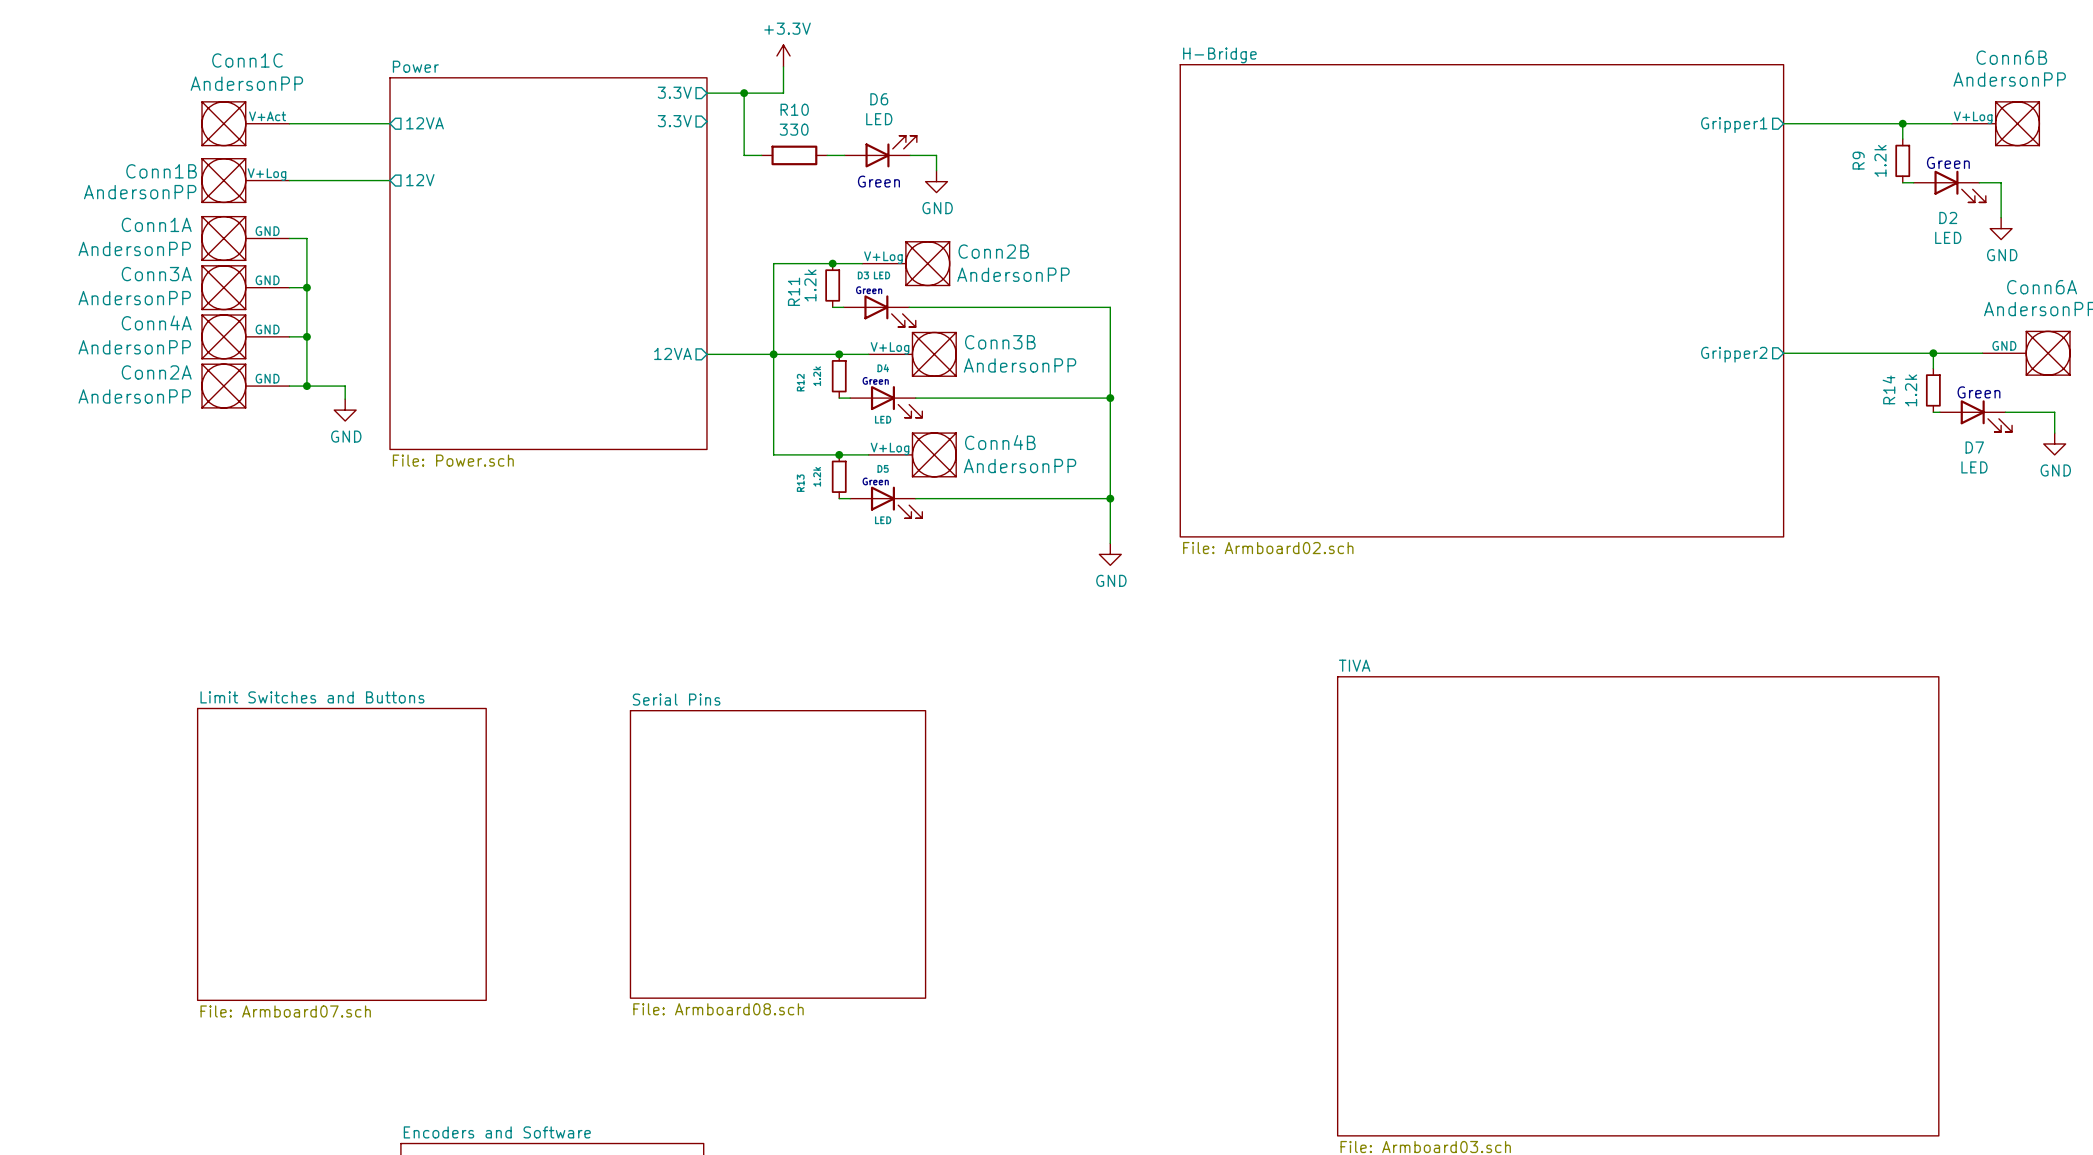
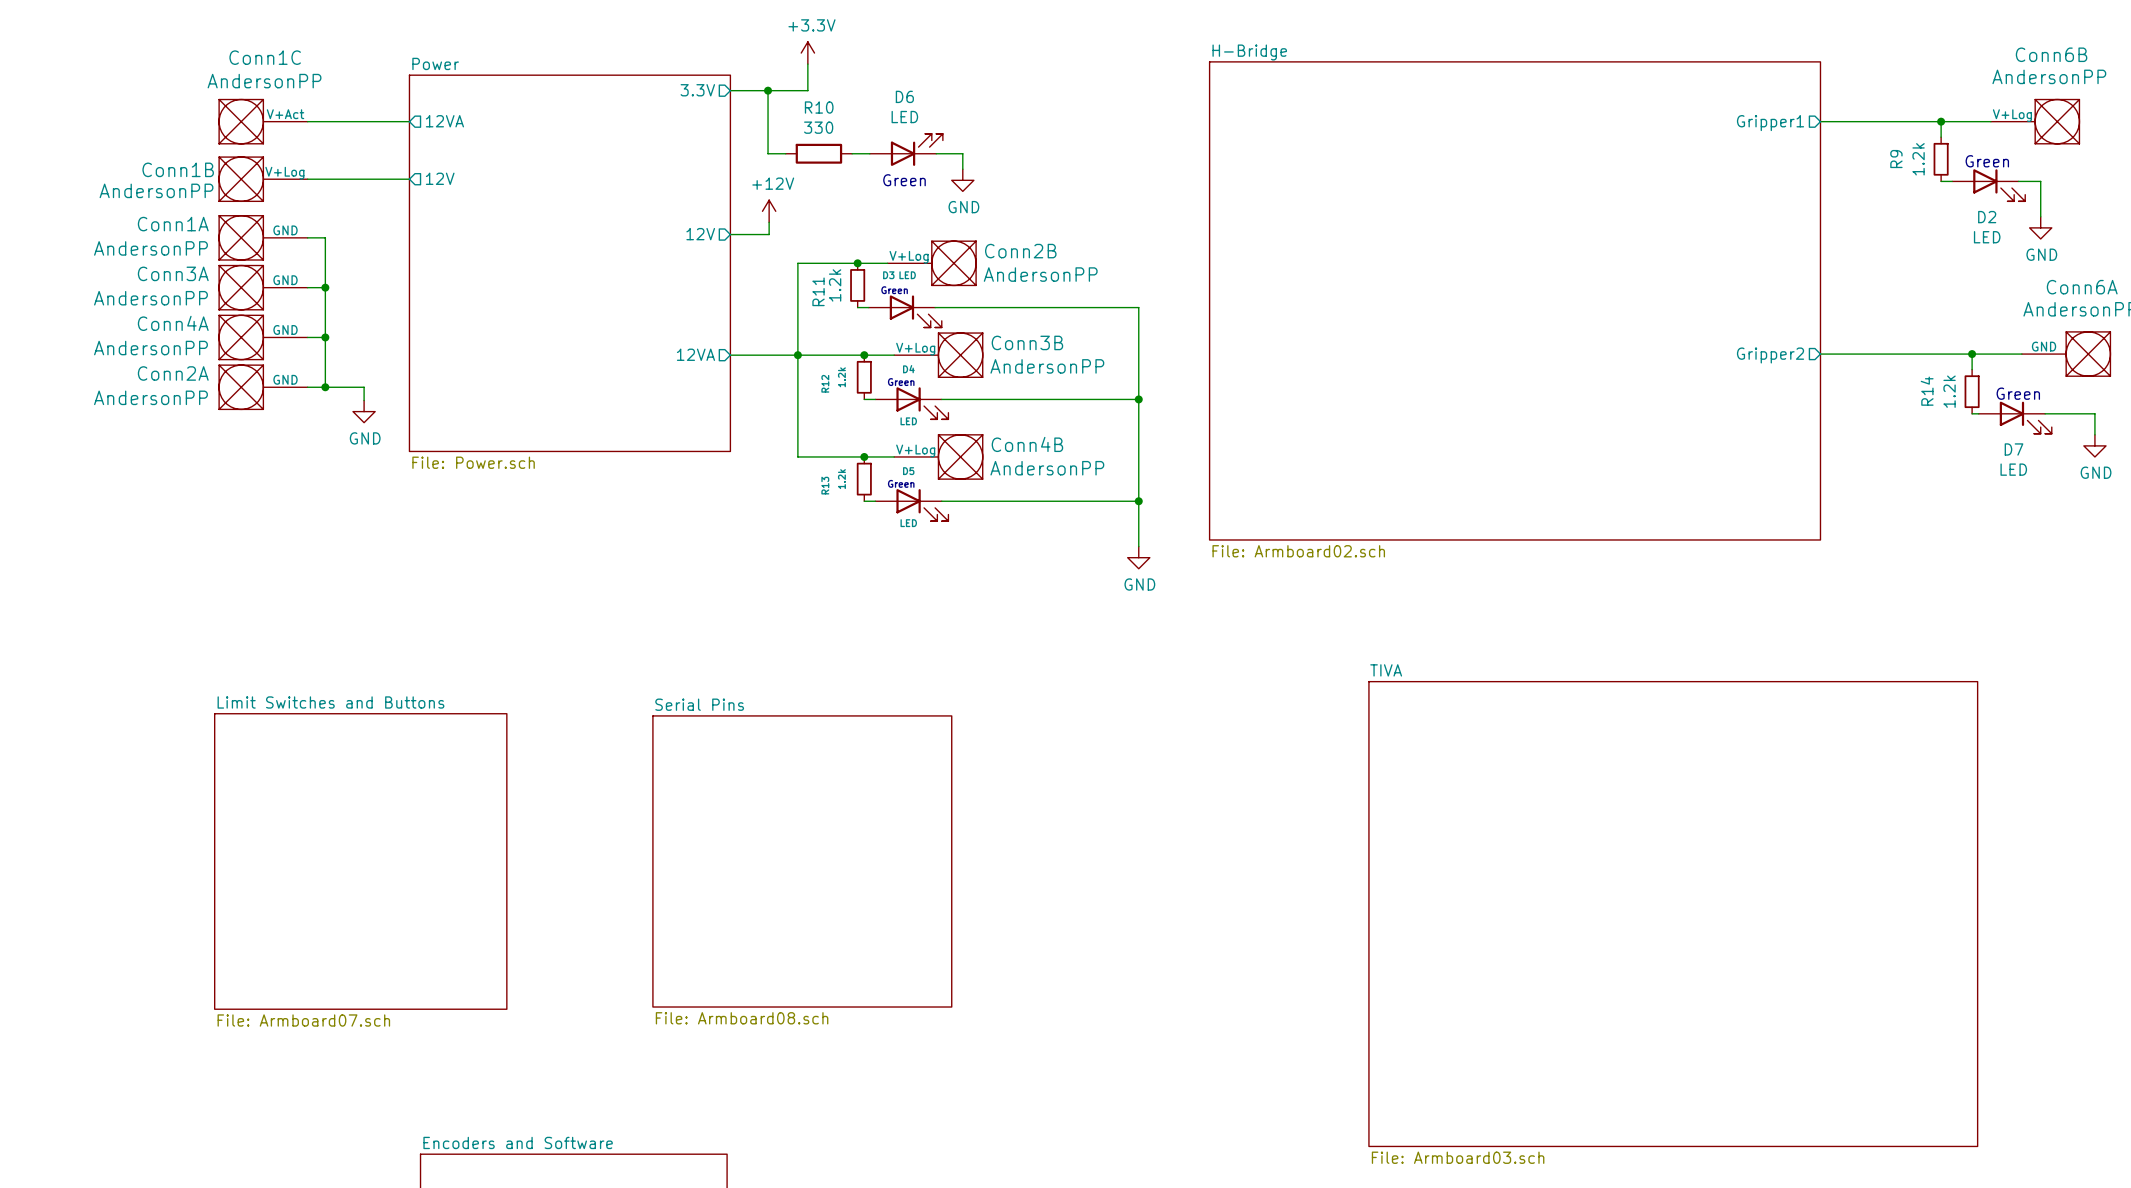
sheet pin: 3.3V (674, 121) -> none
power symbol: none -> +12V (769, 211)
wire: none -> (769, 222) (769, 234) (730, 234)
sheet pin: none -> 12V (700, 234)

